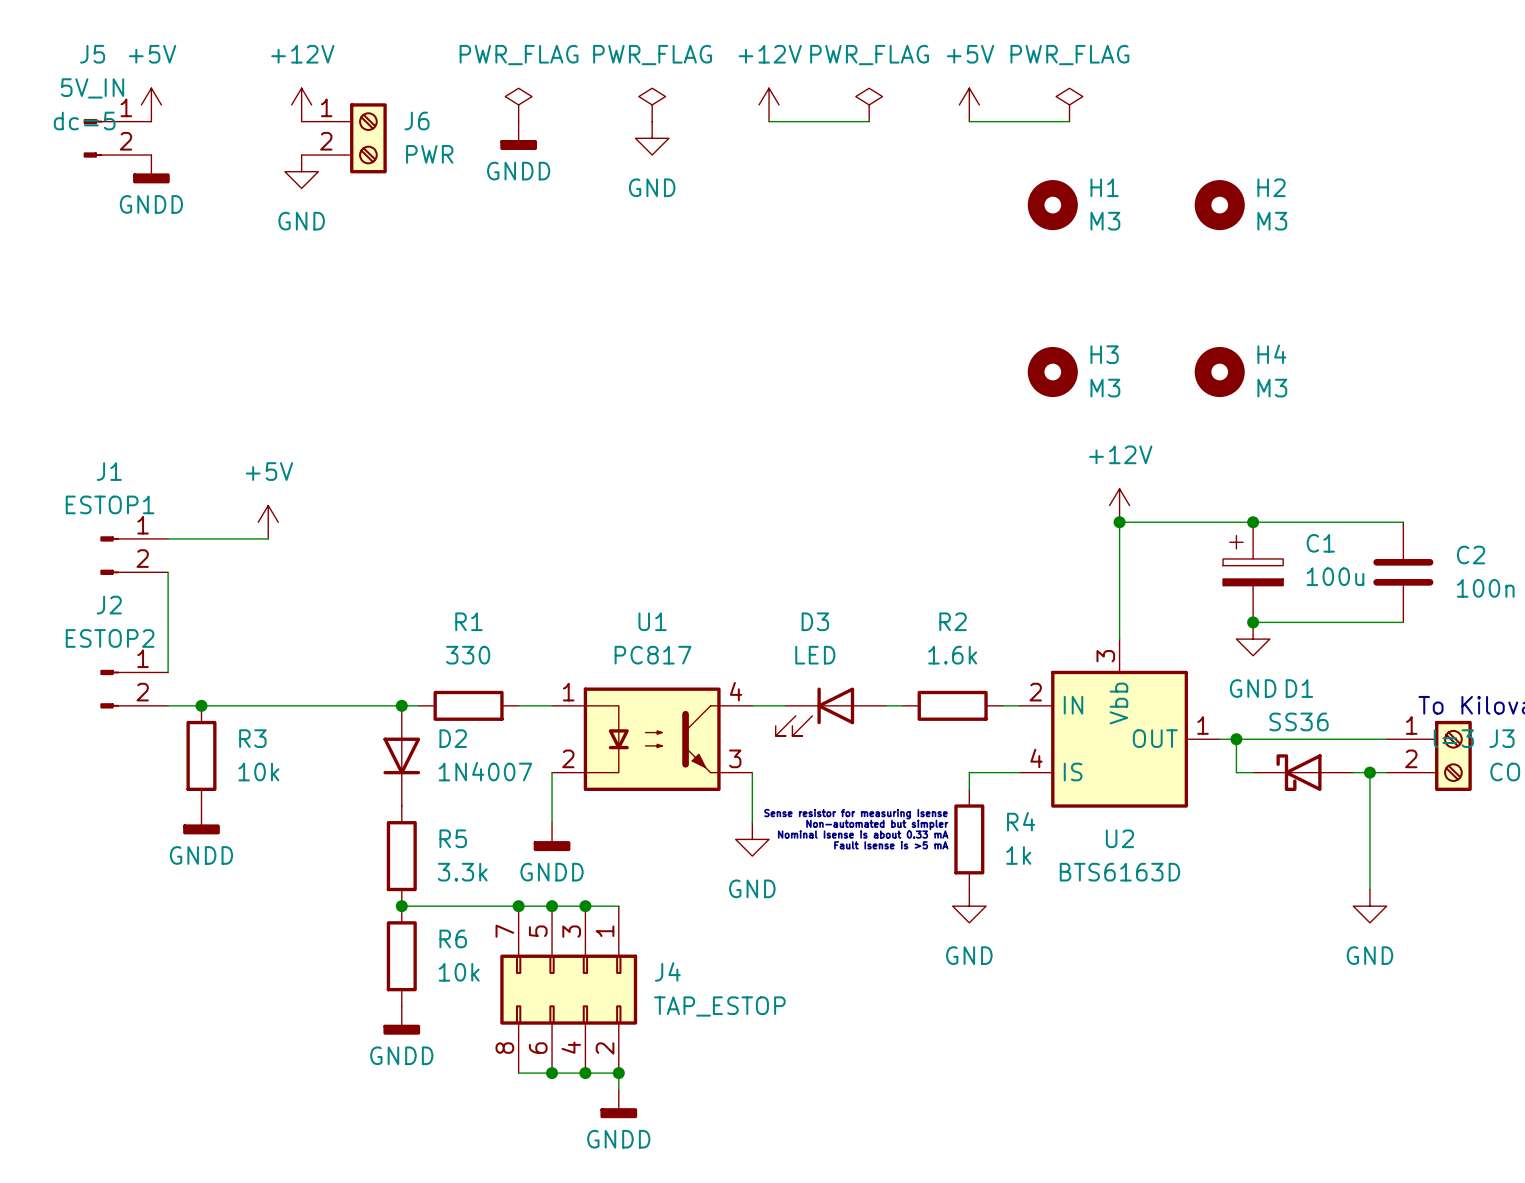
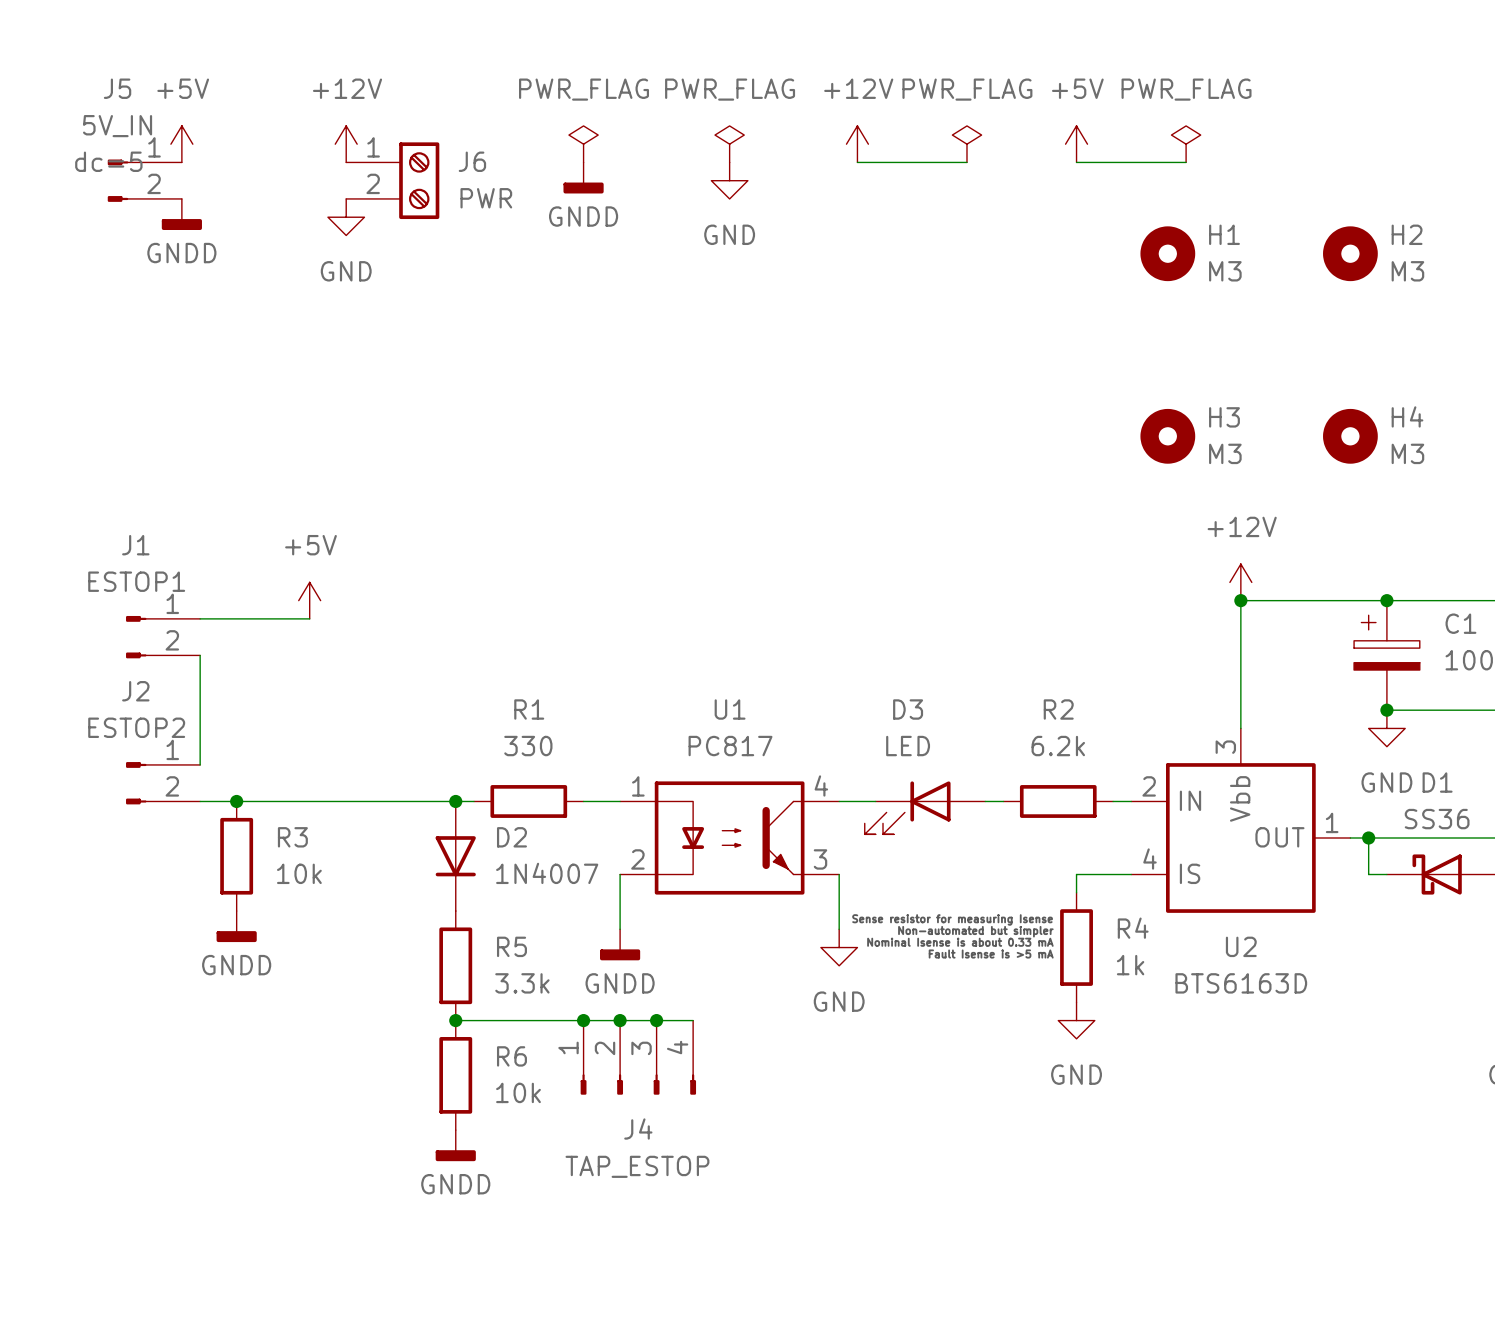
R2 value: 1.6k (952, 655) -> 6.2k (1058, 746)
J4 symbol: [500, 906, 638, 1074] -> [580, 1020, 697, 1095]
J4 name position: J4 (667, 971) -> J4 (638, 1129)
J4 value position: TAP_ESTOP (719, 1006) -> TAP_ESTOP (637, 1166)
wire: (518, 1073) (618, 1073) (618, 1089) -> none
junction: (552, 1073) -> none
junction: (585, 1073) -> none
junction: (618, 1073) -> none
power symbol: GNDD (618, 1103) -> none

